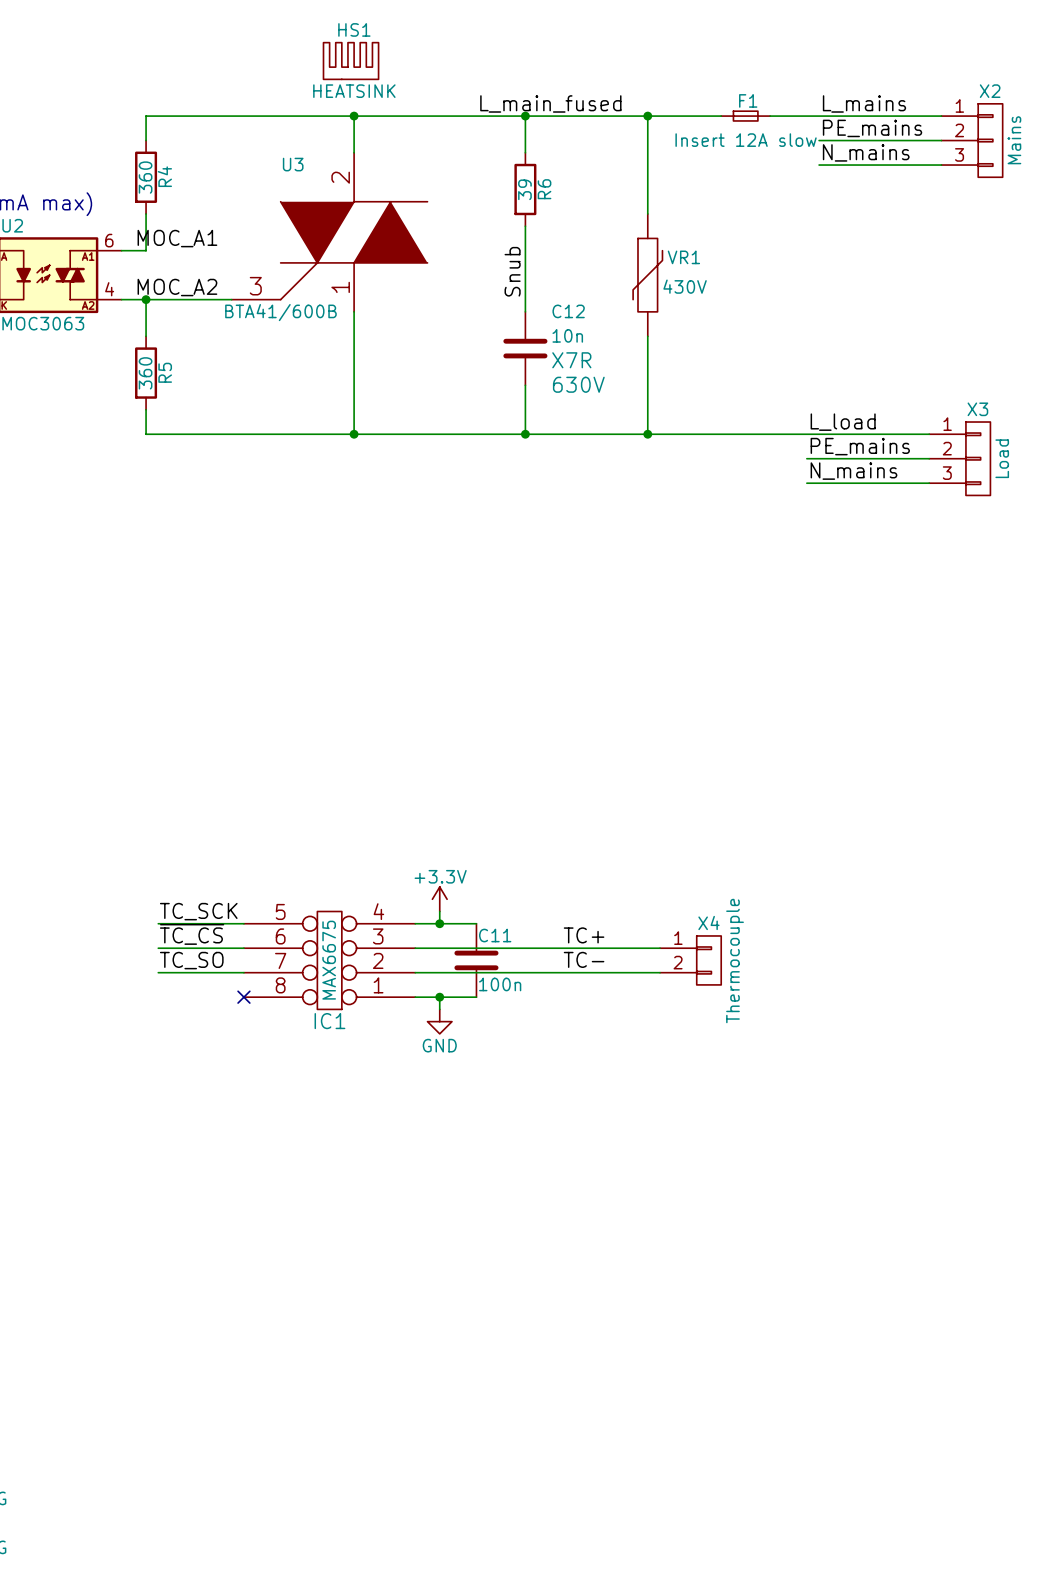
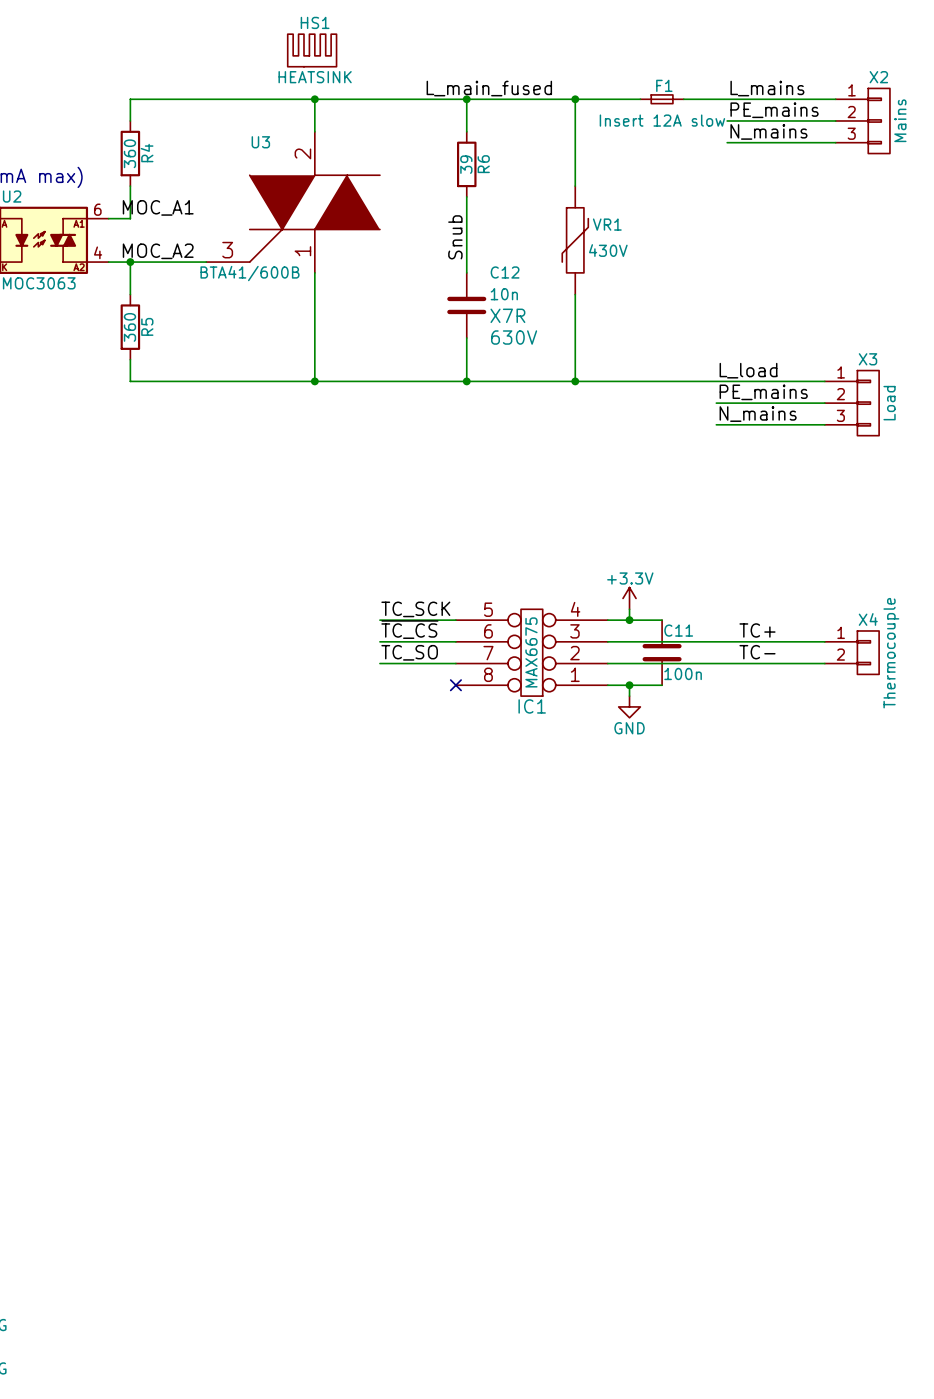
power symbol: none -> +3.3V (629, 598)
label: none -> TC_SCK (415, 609)
wire: none -> (629, 609) (629, 620)
wire: none -> (379, 620) (455, 620)
wire: none -> (607, 620) (662, 620)
junction: none -> (629, 620)
label: none -> ~{TC_CS} (409, 629)
label: none -> TC+ (757, 630)
wire: none -> (379, 641) (455, 641)
wire: none -> (607, 641) (824, 641)
label: none -> TC- (757, 652)
label: none -> TC_SO (409, 652)
wire: none -> (379, 663) (455, 663)
wire: none -> (607, 663) (824, 663)
no-connect mark: none -> (455, 685)
wire: none -> (607, 685) (662, 685)
wire: none -> (629, 685) (629, 696)
junction: none -> (629, 685)
power symbol: none -> GND (629, 706)
power symbol: +3.3V (439, 899) -> none
label: TC_SCK (198, 911) -> none
wire: (439, 911) (439, 923) -> none
wire: (158, 923) (243, 923) -> none
wire: (415, 923) (476, 923) -> none
junction: (439, 923) -> none
label: ~{TC_CS} (192, 934) -> none
label: TC+ (584, 935) -> none
wire: (158, 948) (243, 948) -> none
wire: (415, 948) (660, 948) -> none
label: TC- (584, 959) -> none
label: TC_SO (191, 960) -> none
IC1 position: (329, 960) -> (531, 652)
C11 position: (476, 960) -> (662, 652)
X4 position: (690, 960) -> (851, 652)
wire: (158, 972) (243, 972) -> none
wire: (415, 972) (660, 972) -> none
no-connect mark: (243, 997) -> none
wire: (415, 997) (476, 997) -> none
wire: (439, 997) (439, 1009) -> none
junction: (439, 997) -> none
power symbol: GND (439, 1021) -> none

